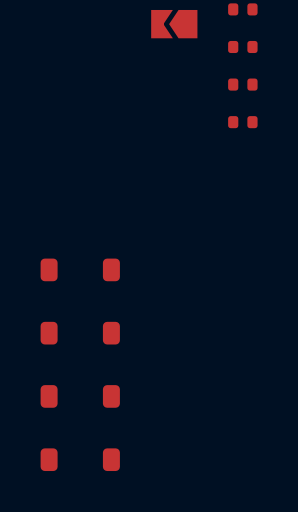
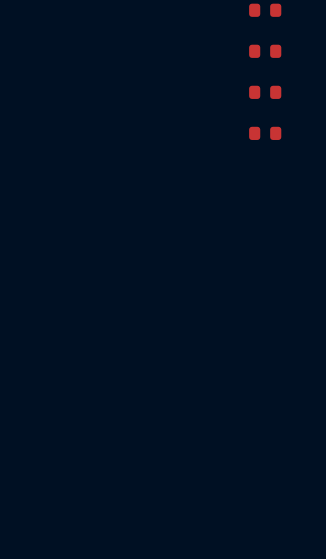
part: (174, 24) -> none
part: (80, 269) -> none
part: (80, 333) -> none
part: (80, 396) -> none
part: (80, 459) -> none

